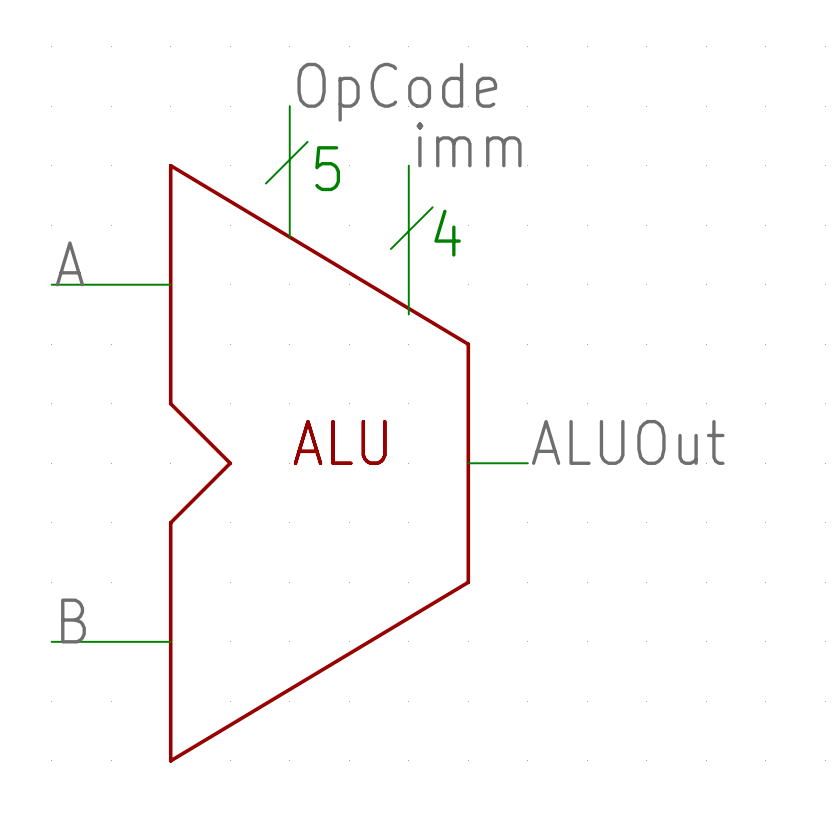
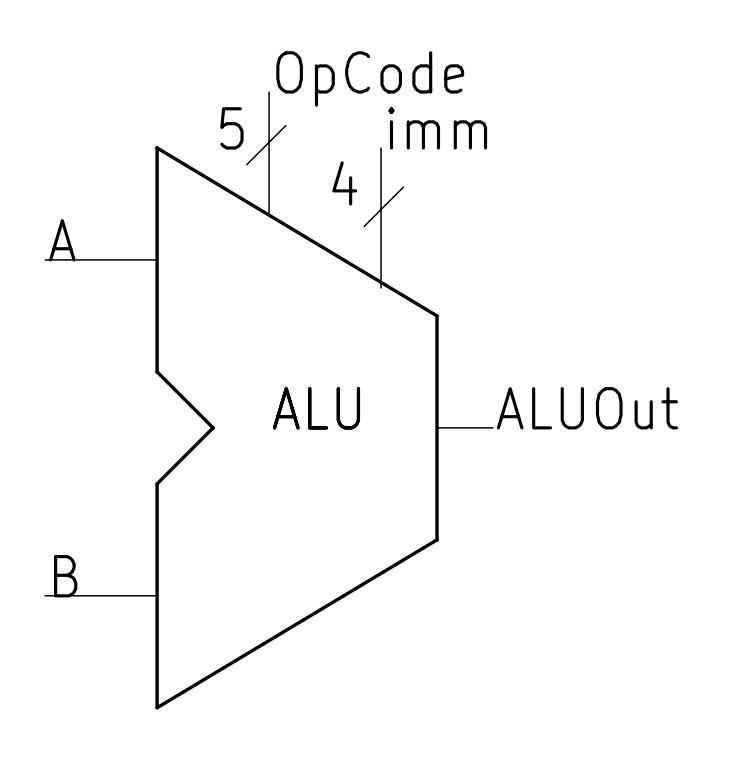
text position: 5 (327, 168) -> 5 (231, 128)
text position: 4 (447, 233) -> 4 (344, 183)

